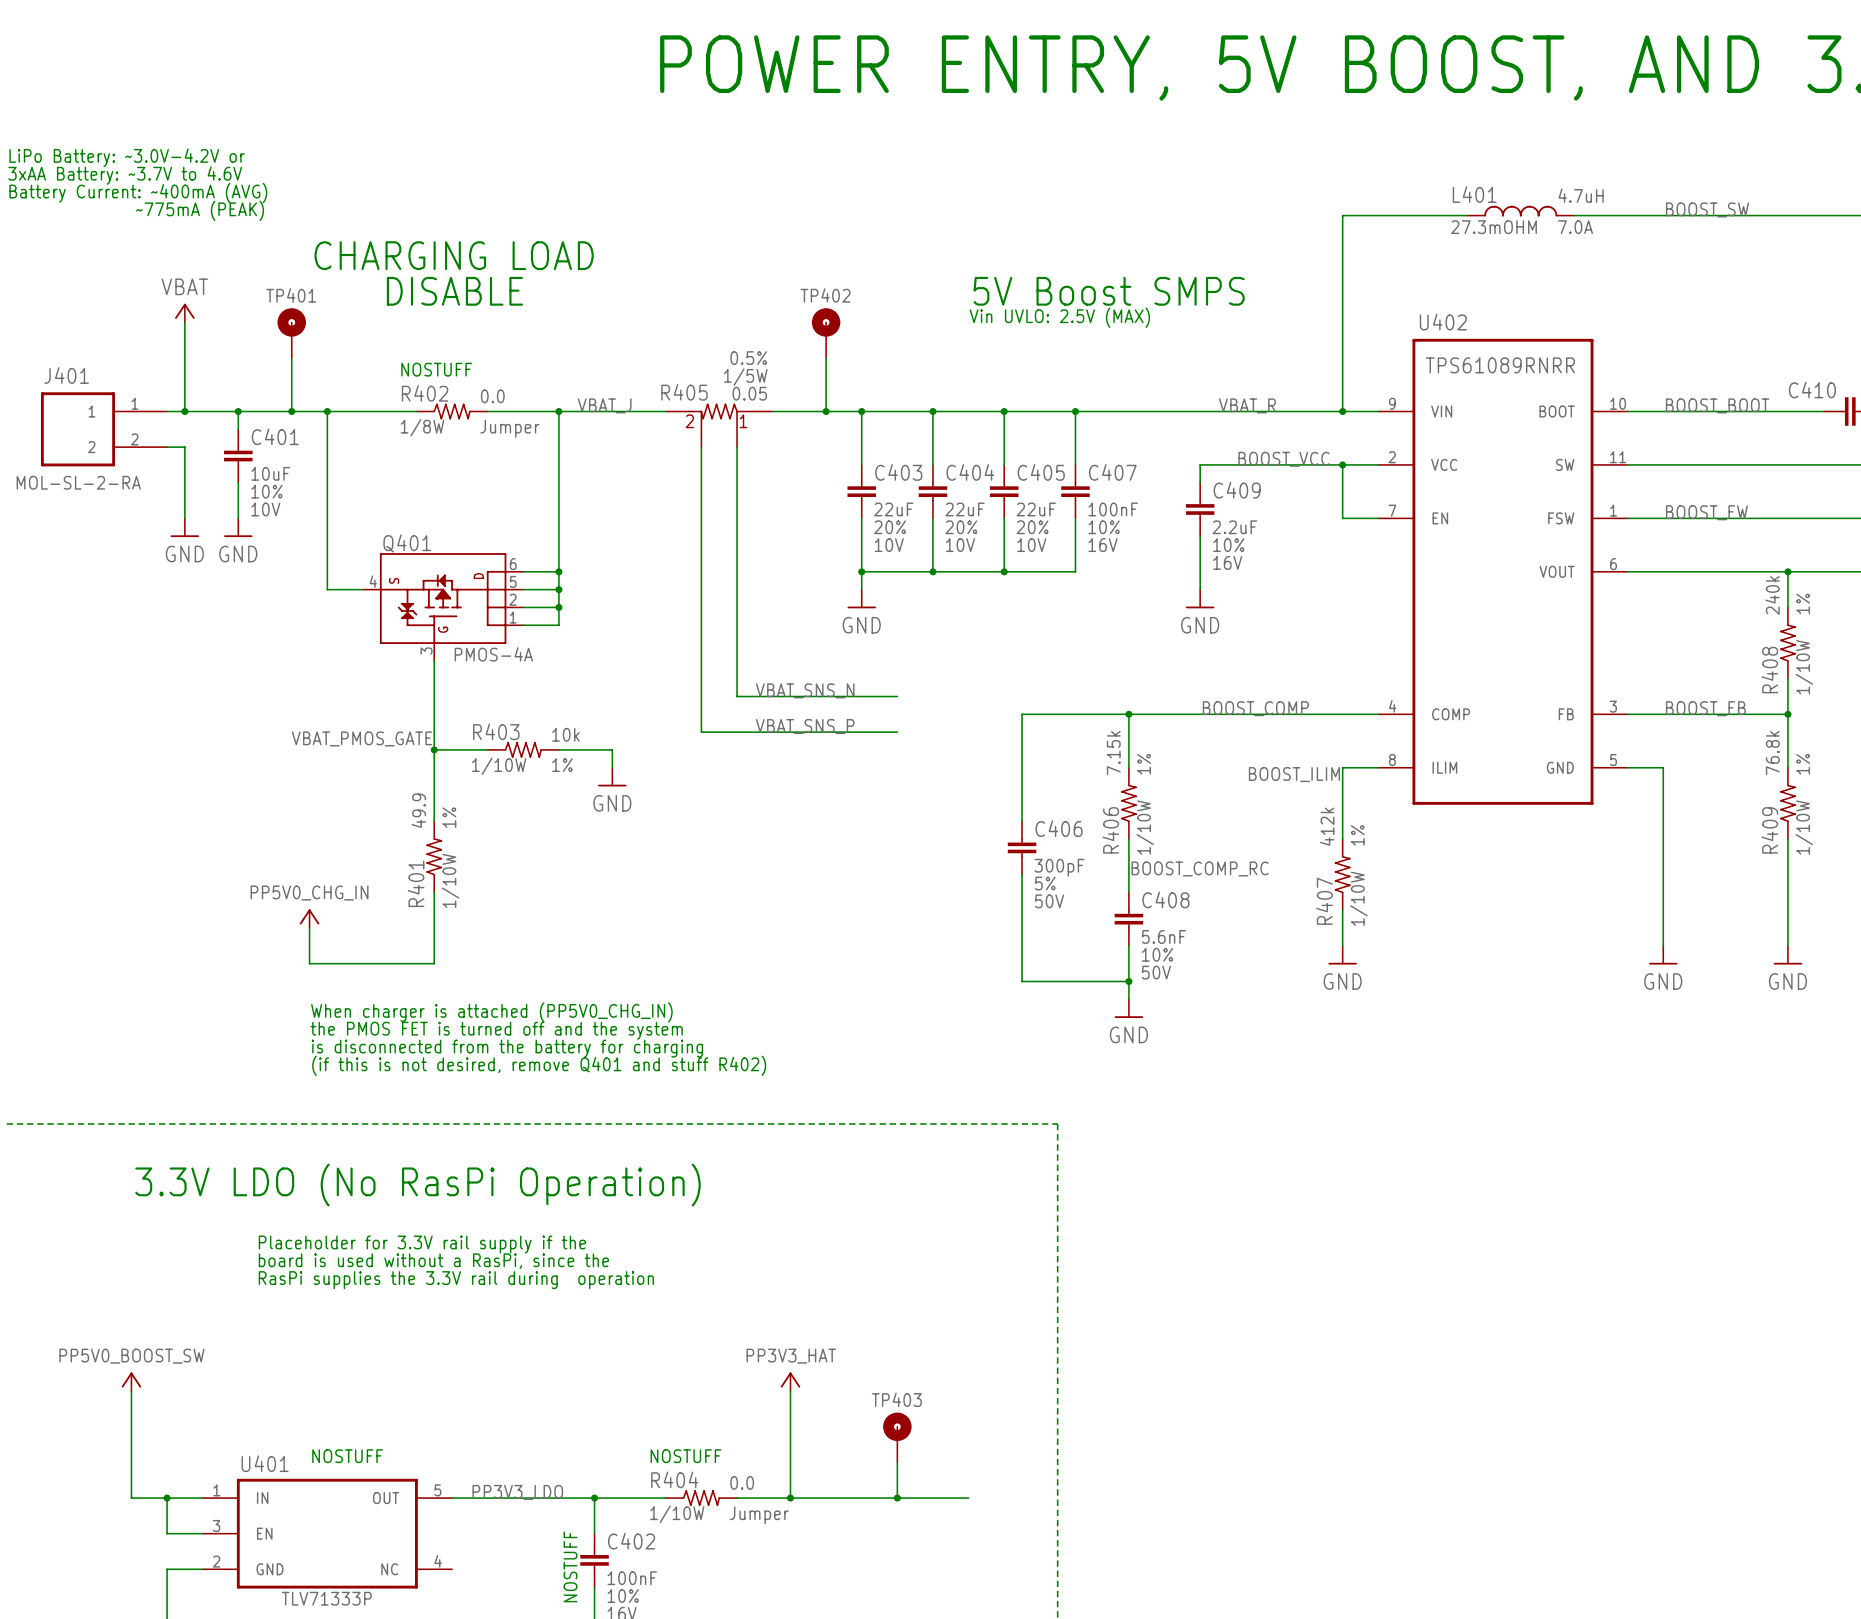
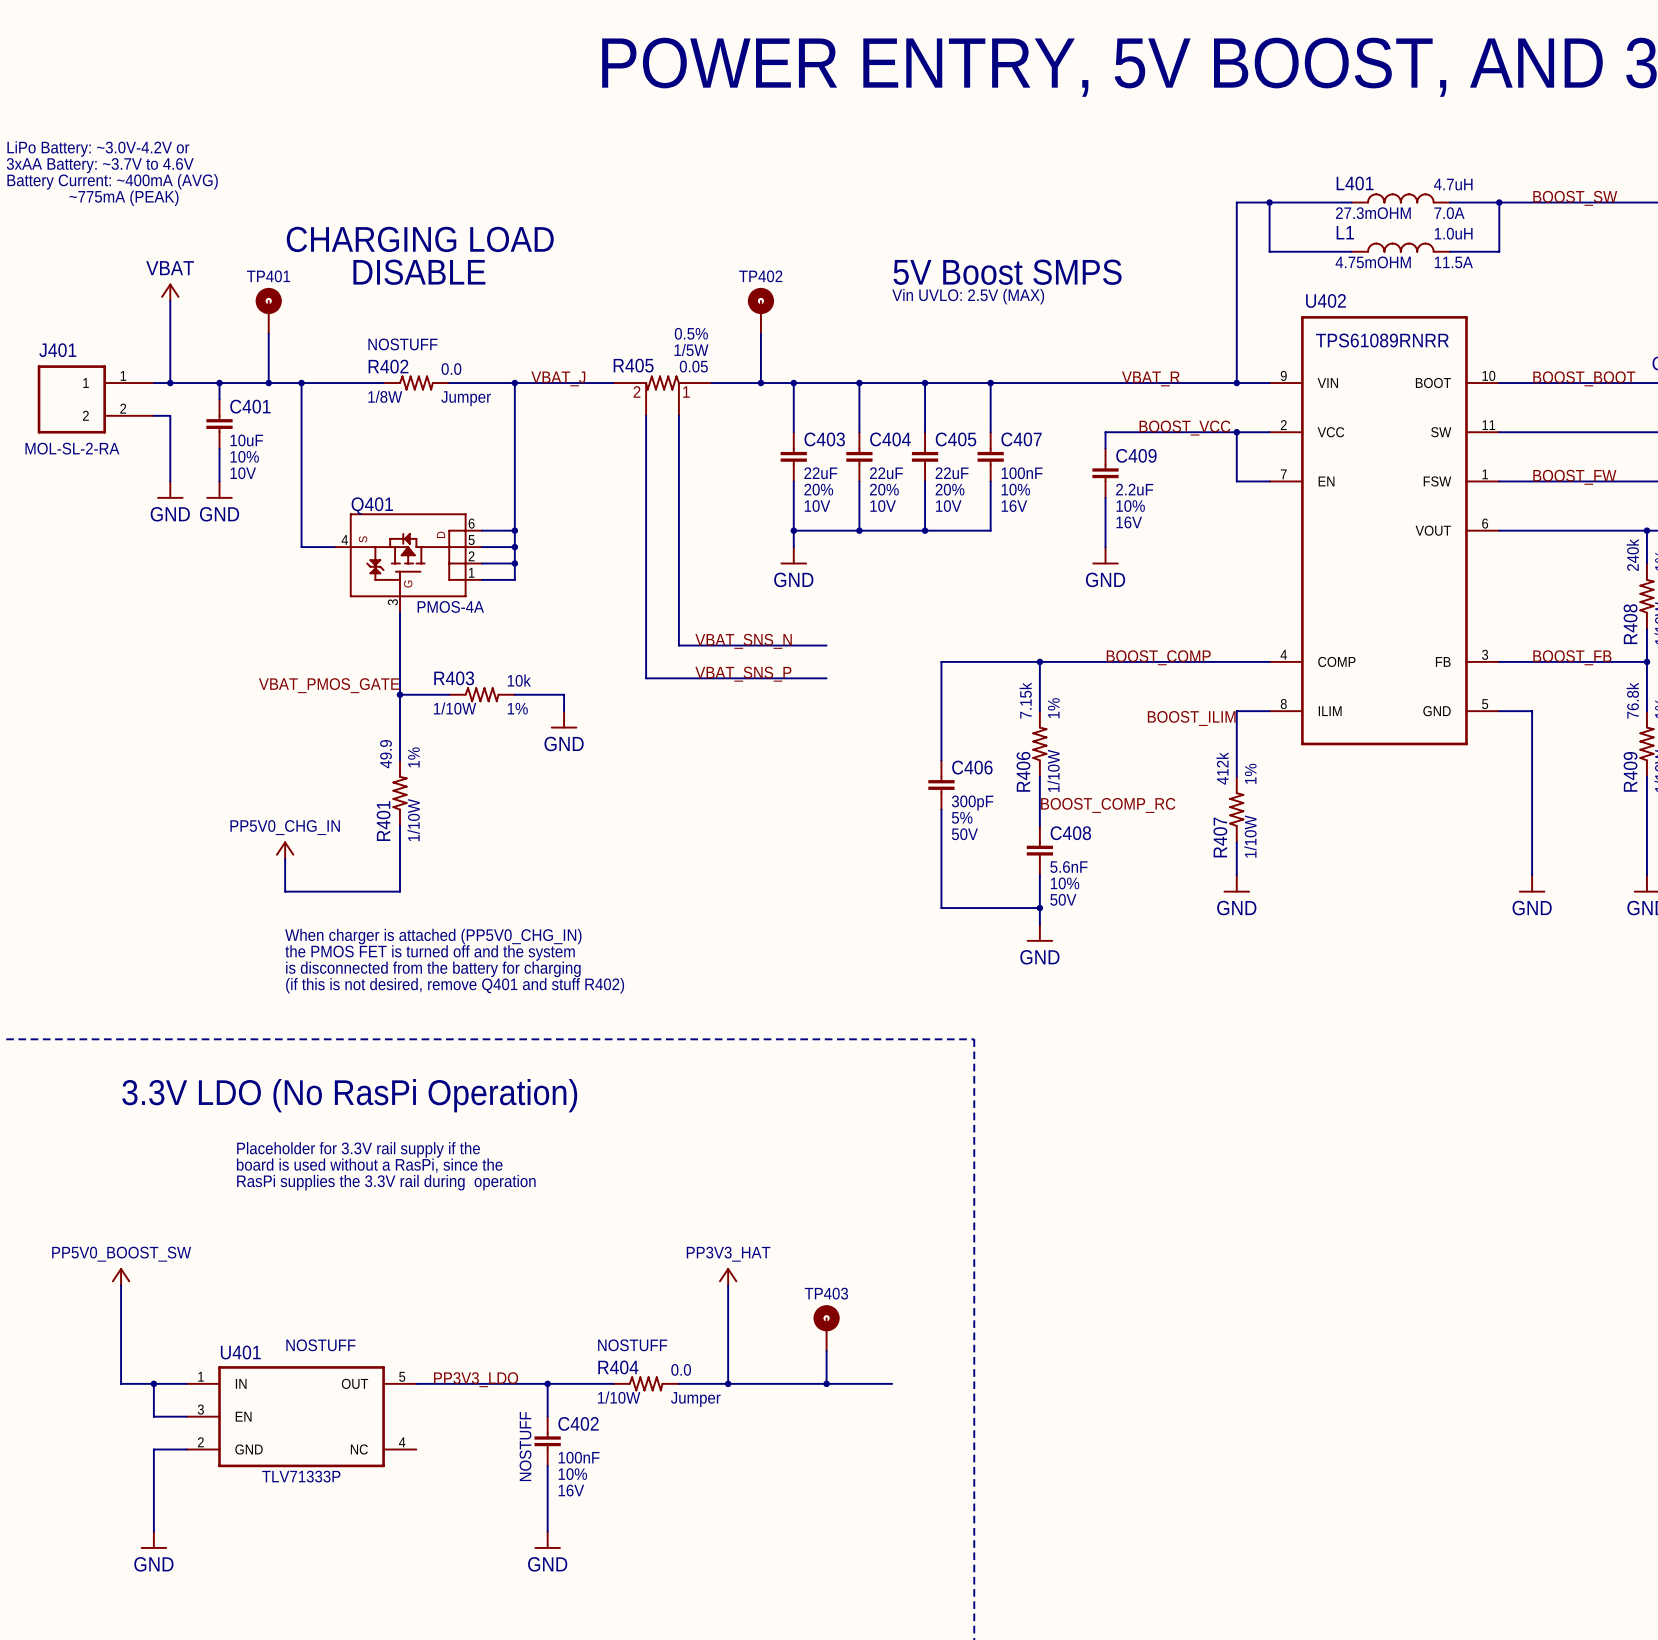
wire: none -> (1269, 202) (1269, 251) (1351, 251)
junction: none -> (1269, 202)
wire: none -> (1499, 202) (1499, 251) (1450, 251)
junction: none -> (1499, 202)
L1: none -> 1.0uH (1400, 247)

